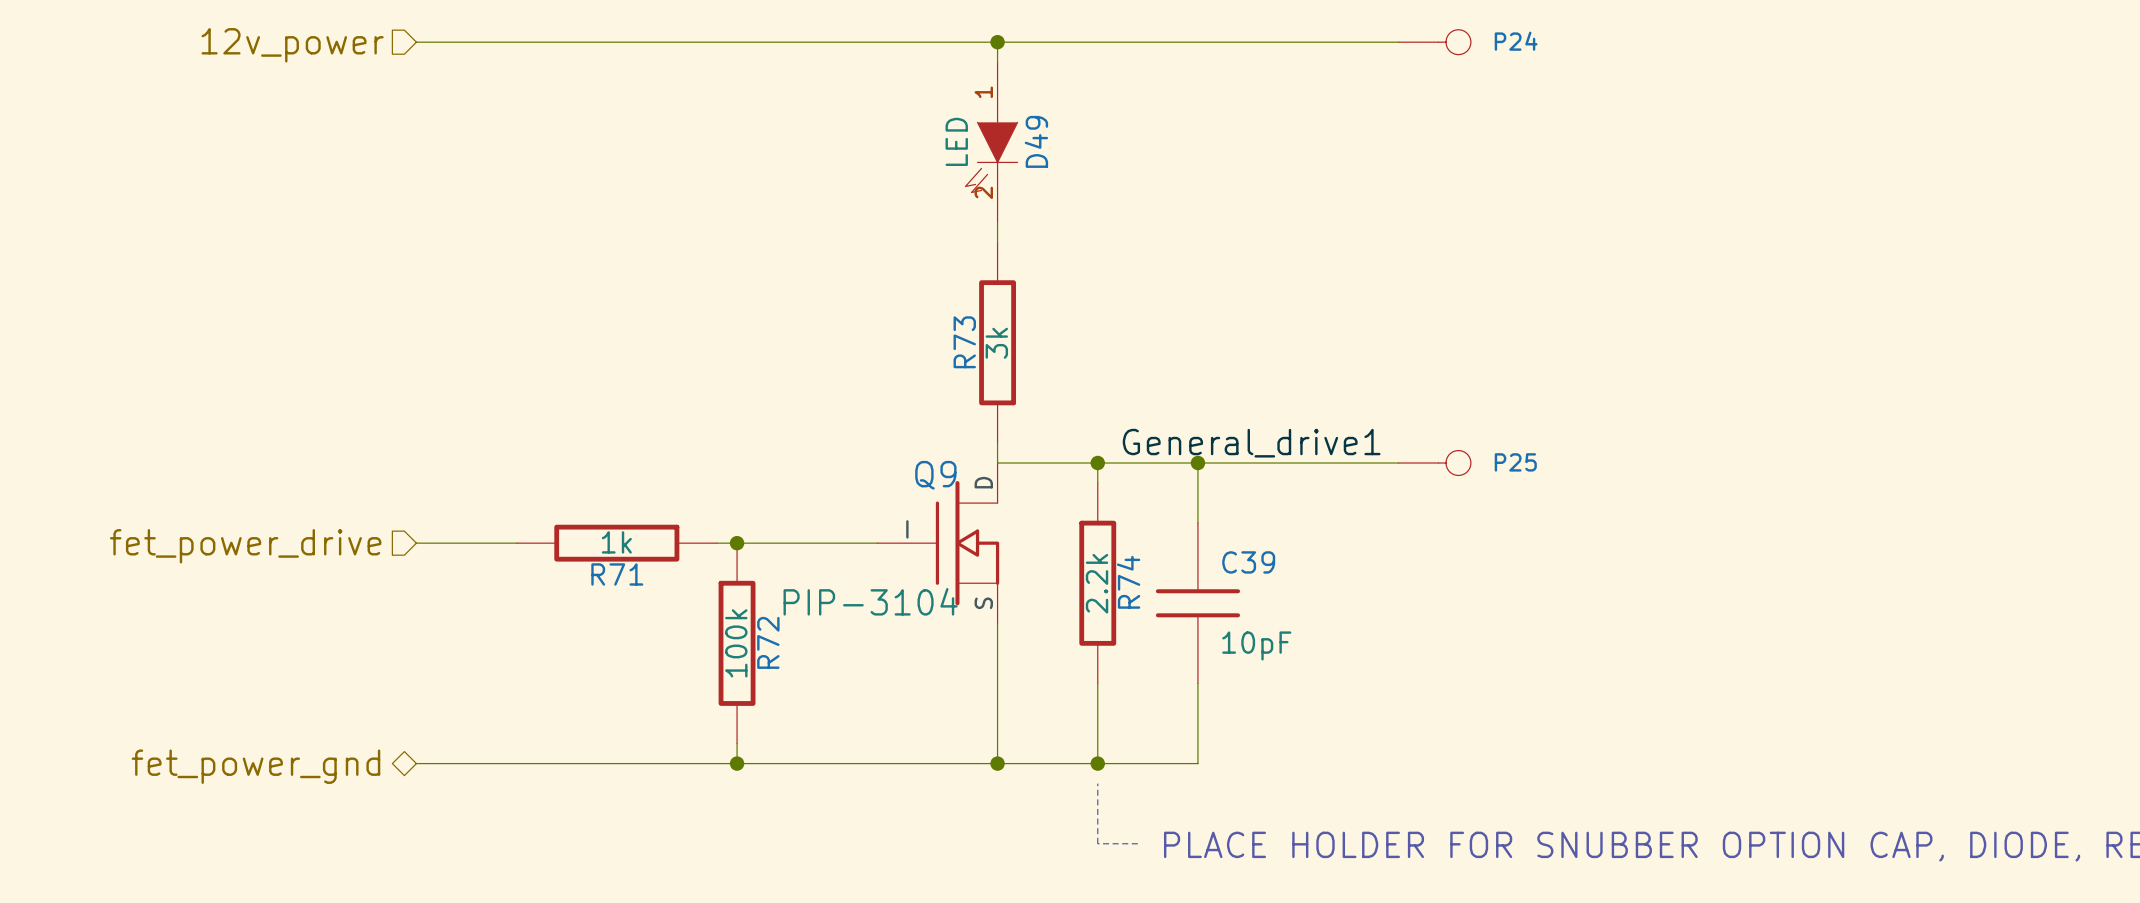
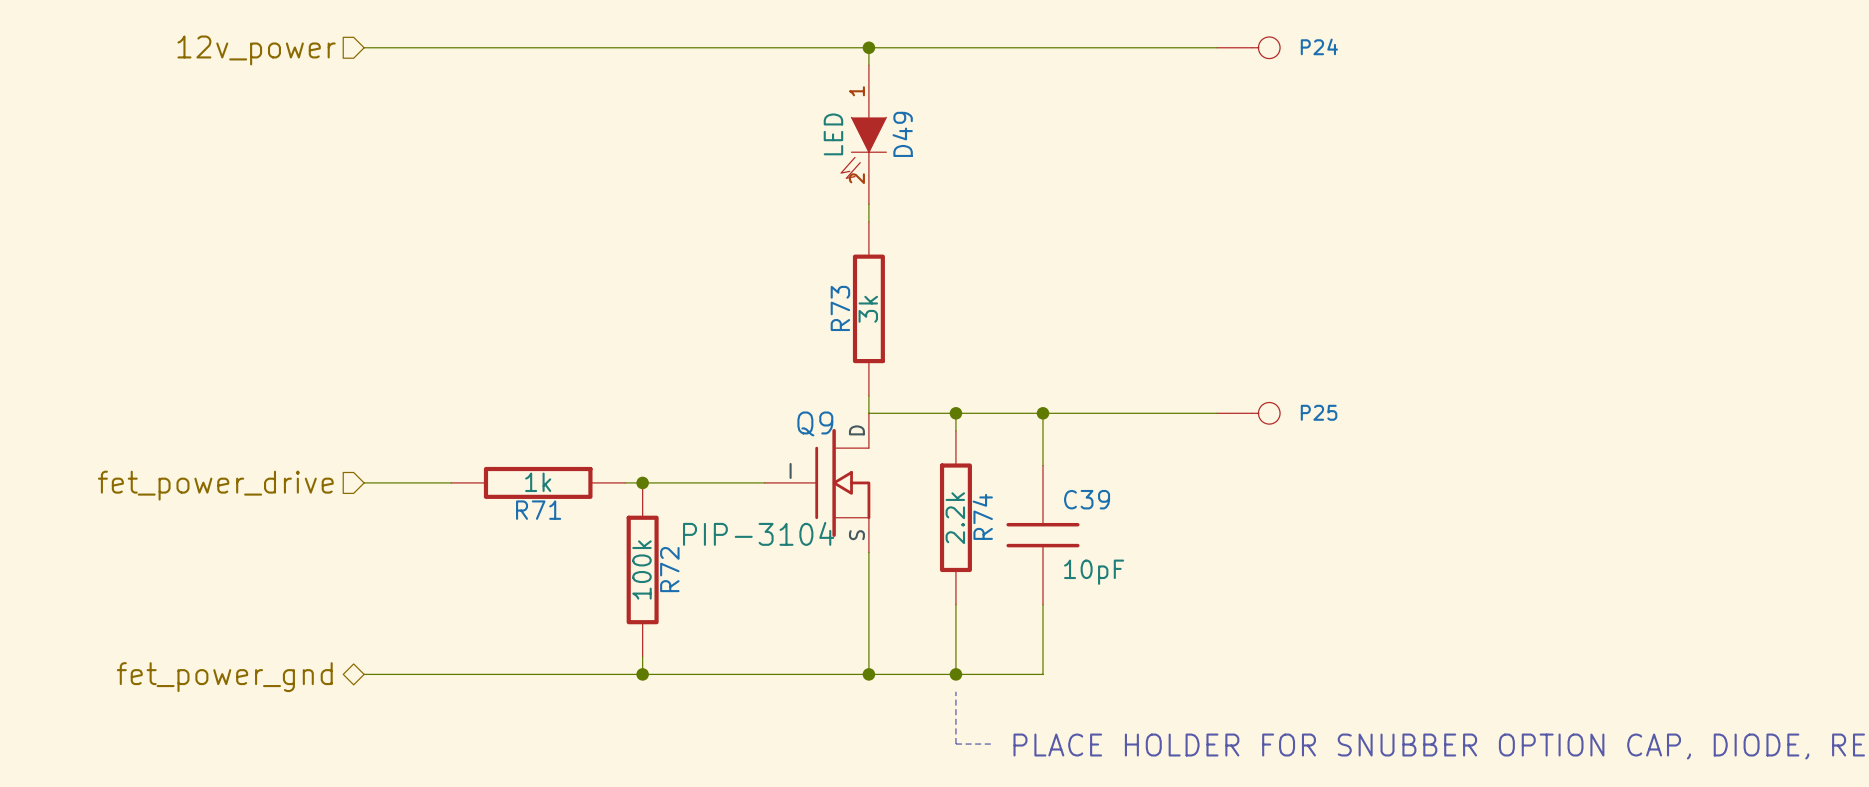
label: General_drive1 (1251, 443) -> none

